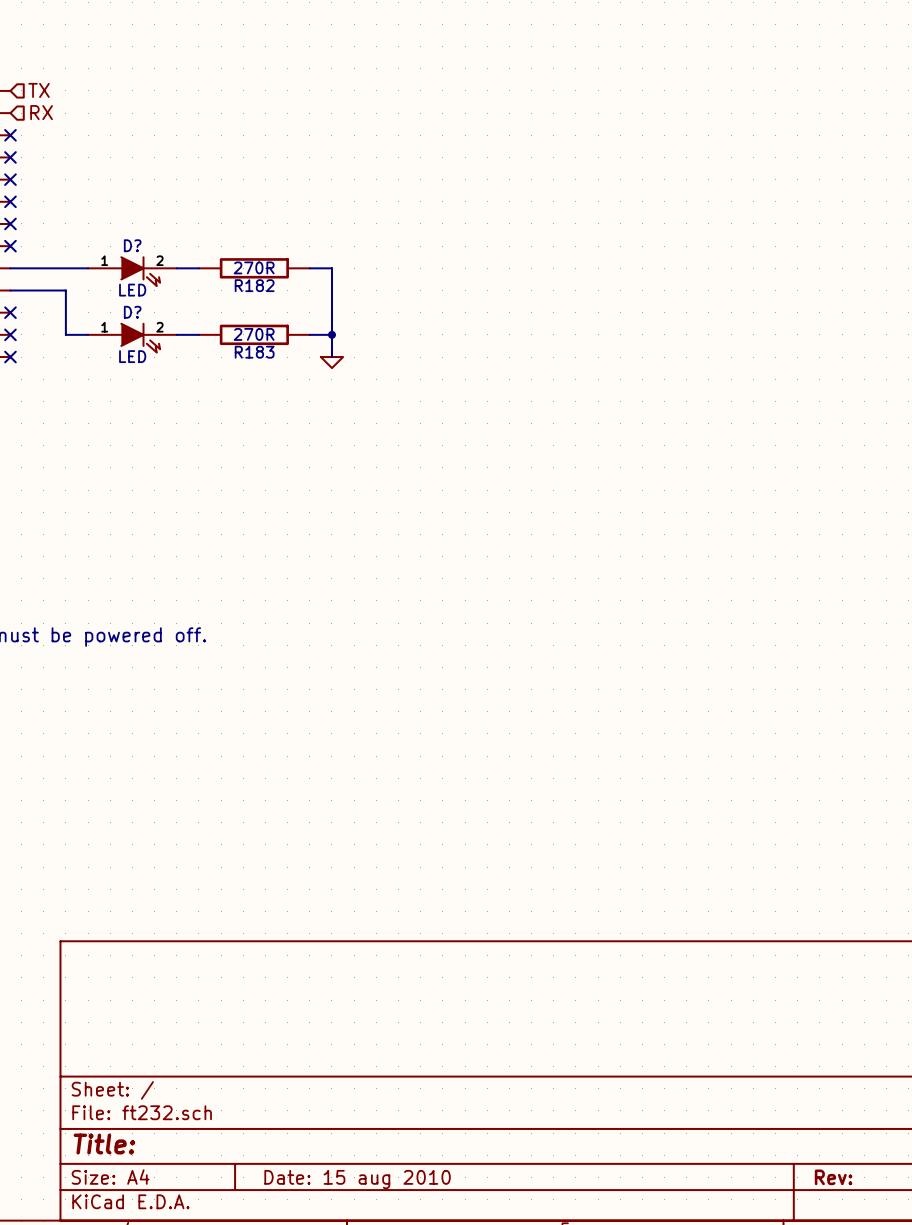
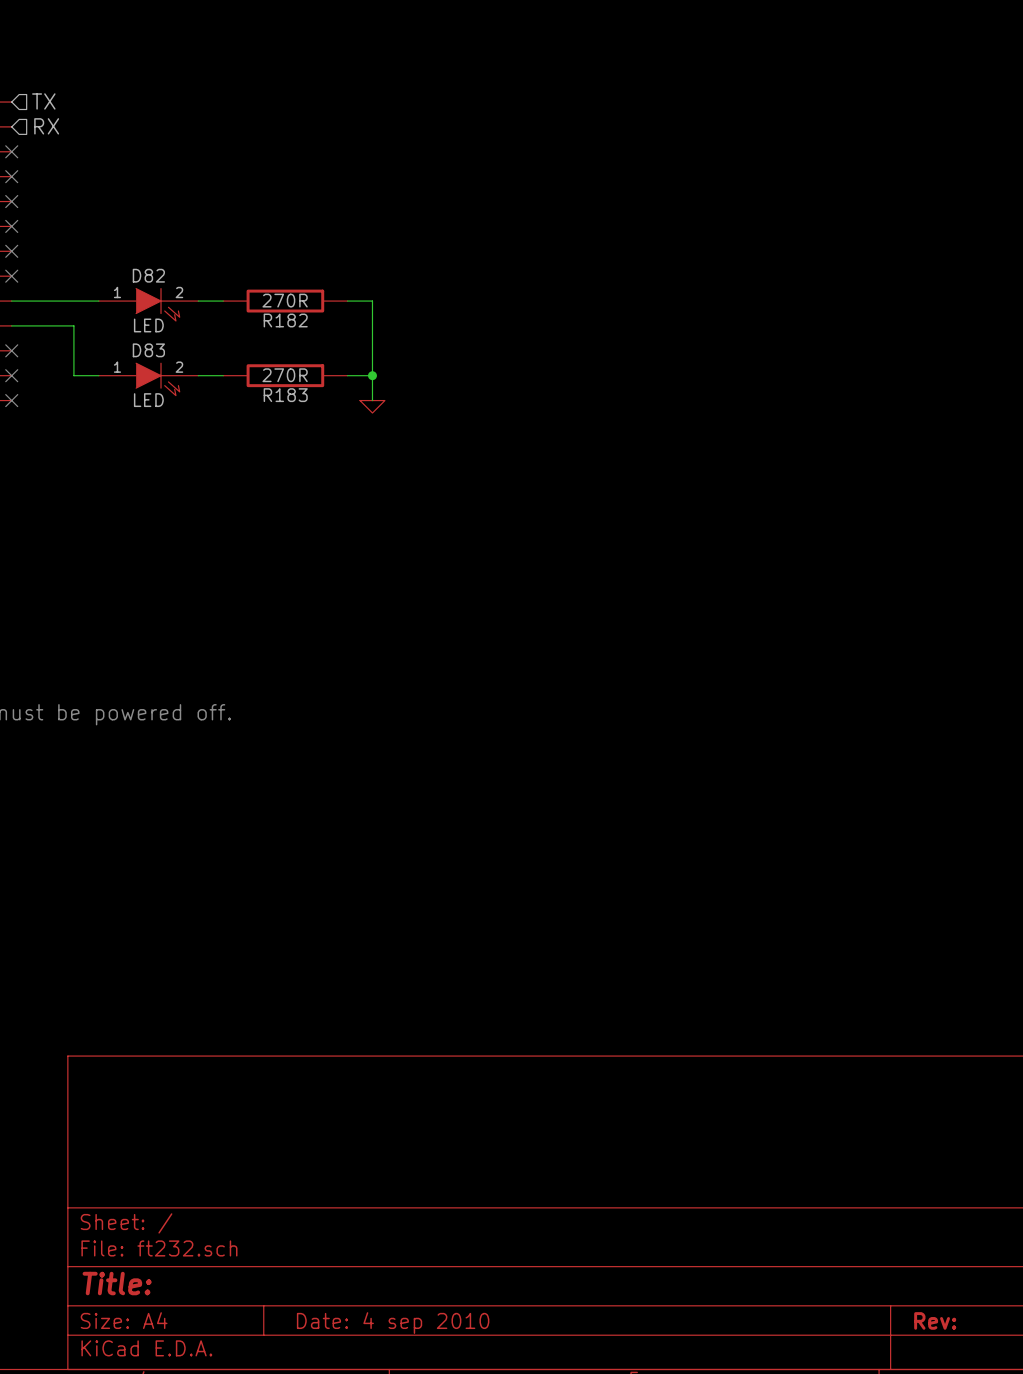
D? name: D? (132, 245) -> D82 (148, 275)
D? name: D? (132, 312) -> D83 (148, 350)
title block: Date: 15 aug 2010 (357, 1179) -> Date: 4 sep 2010 (393, 1323)

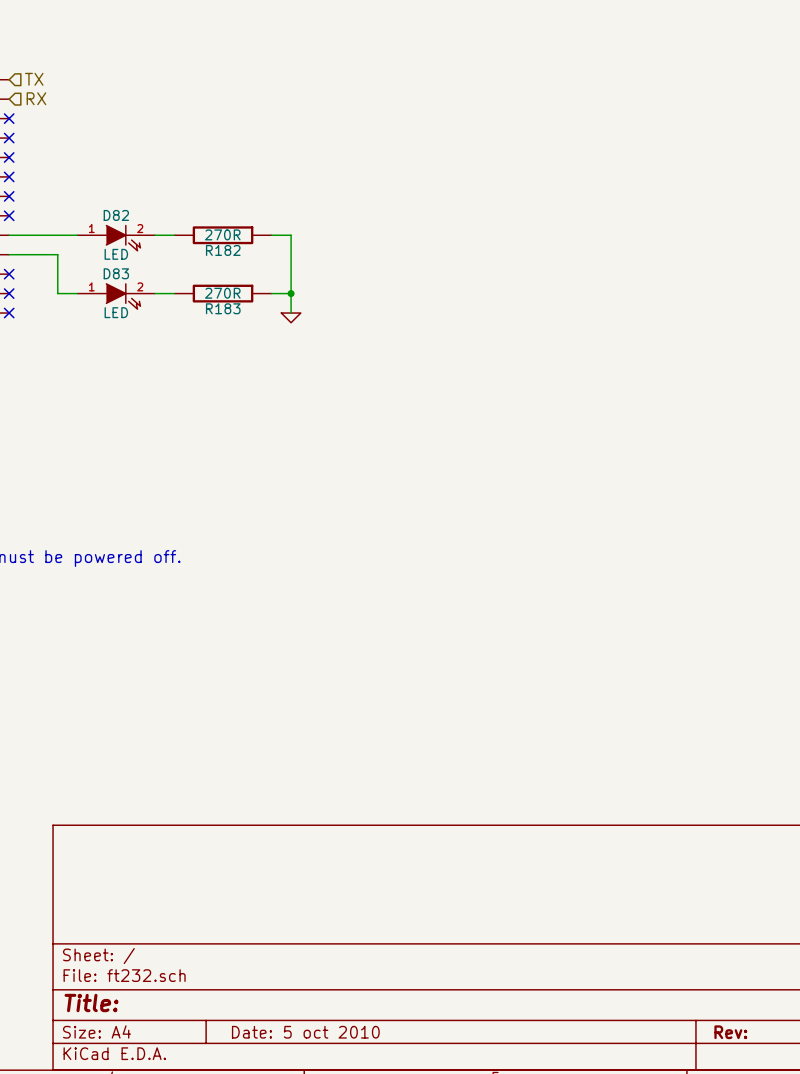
title block: Date: 4 sep 2010 (393, 1323) -> Date: 5 oct 2010 (305, 1032)

